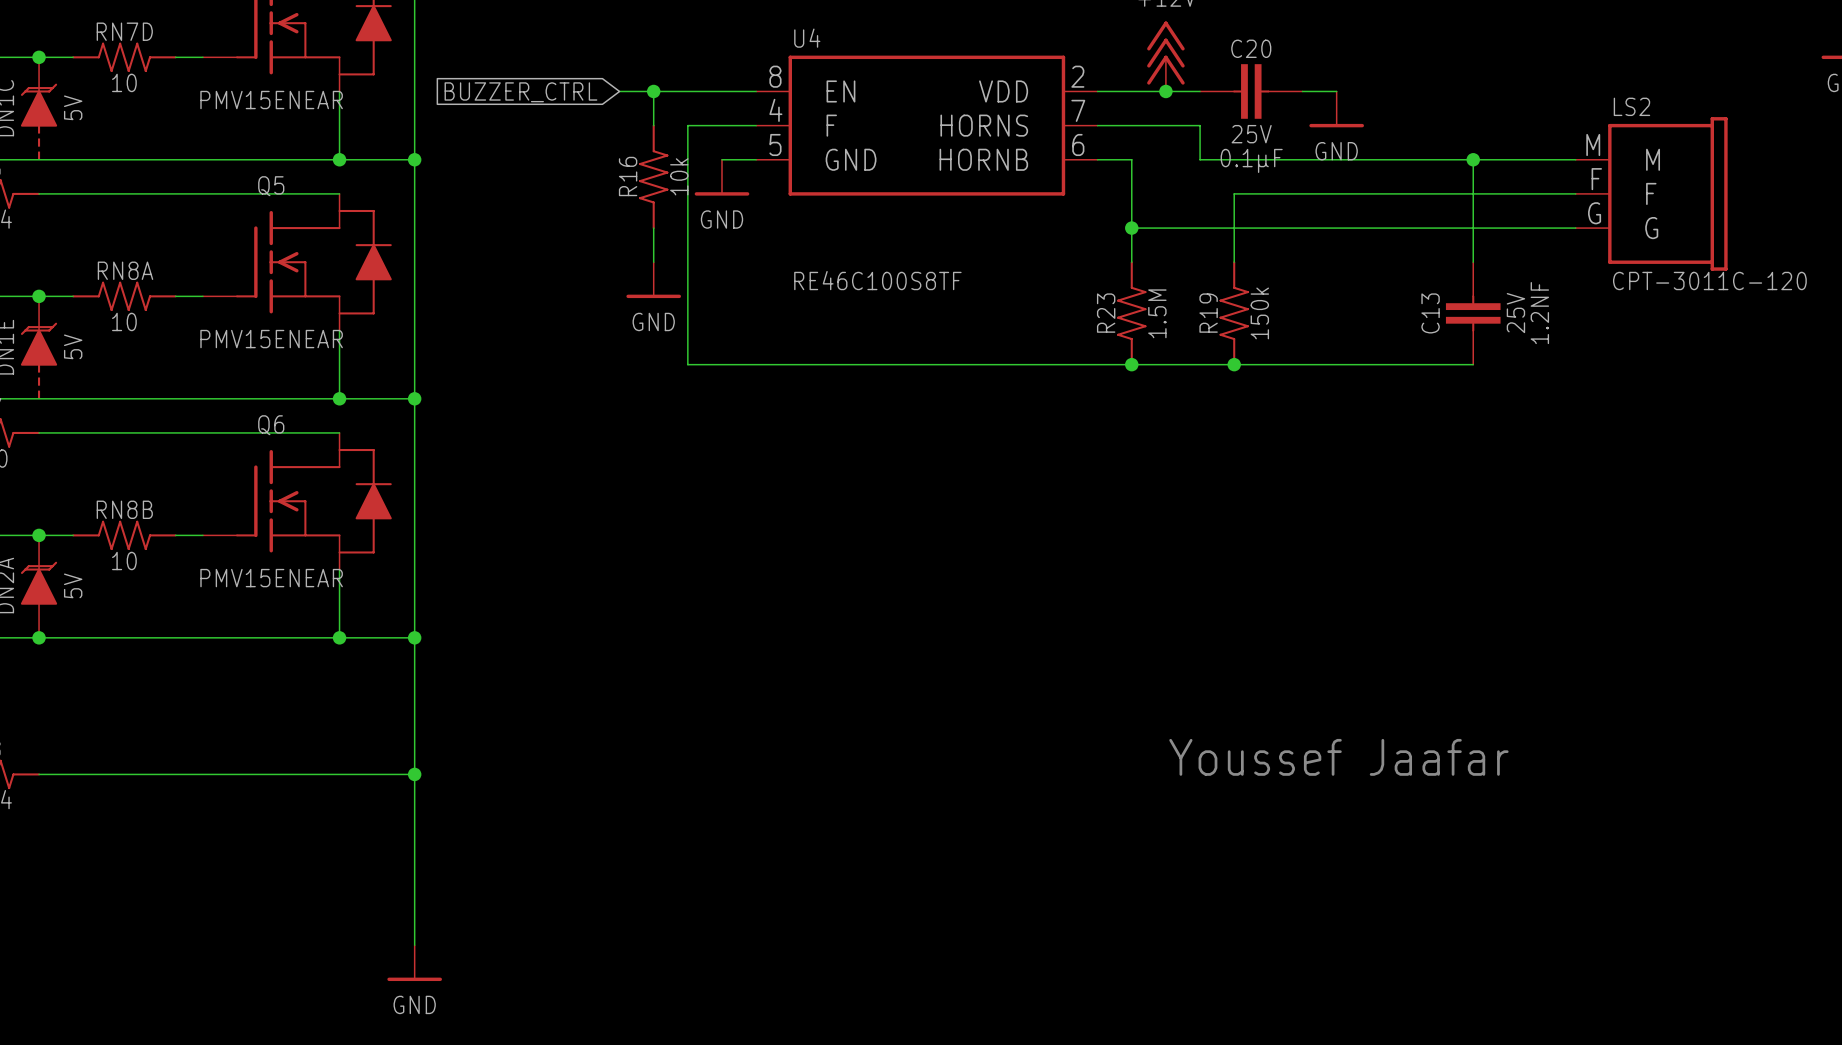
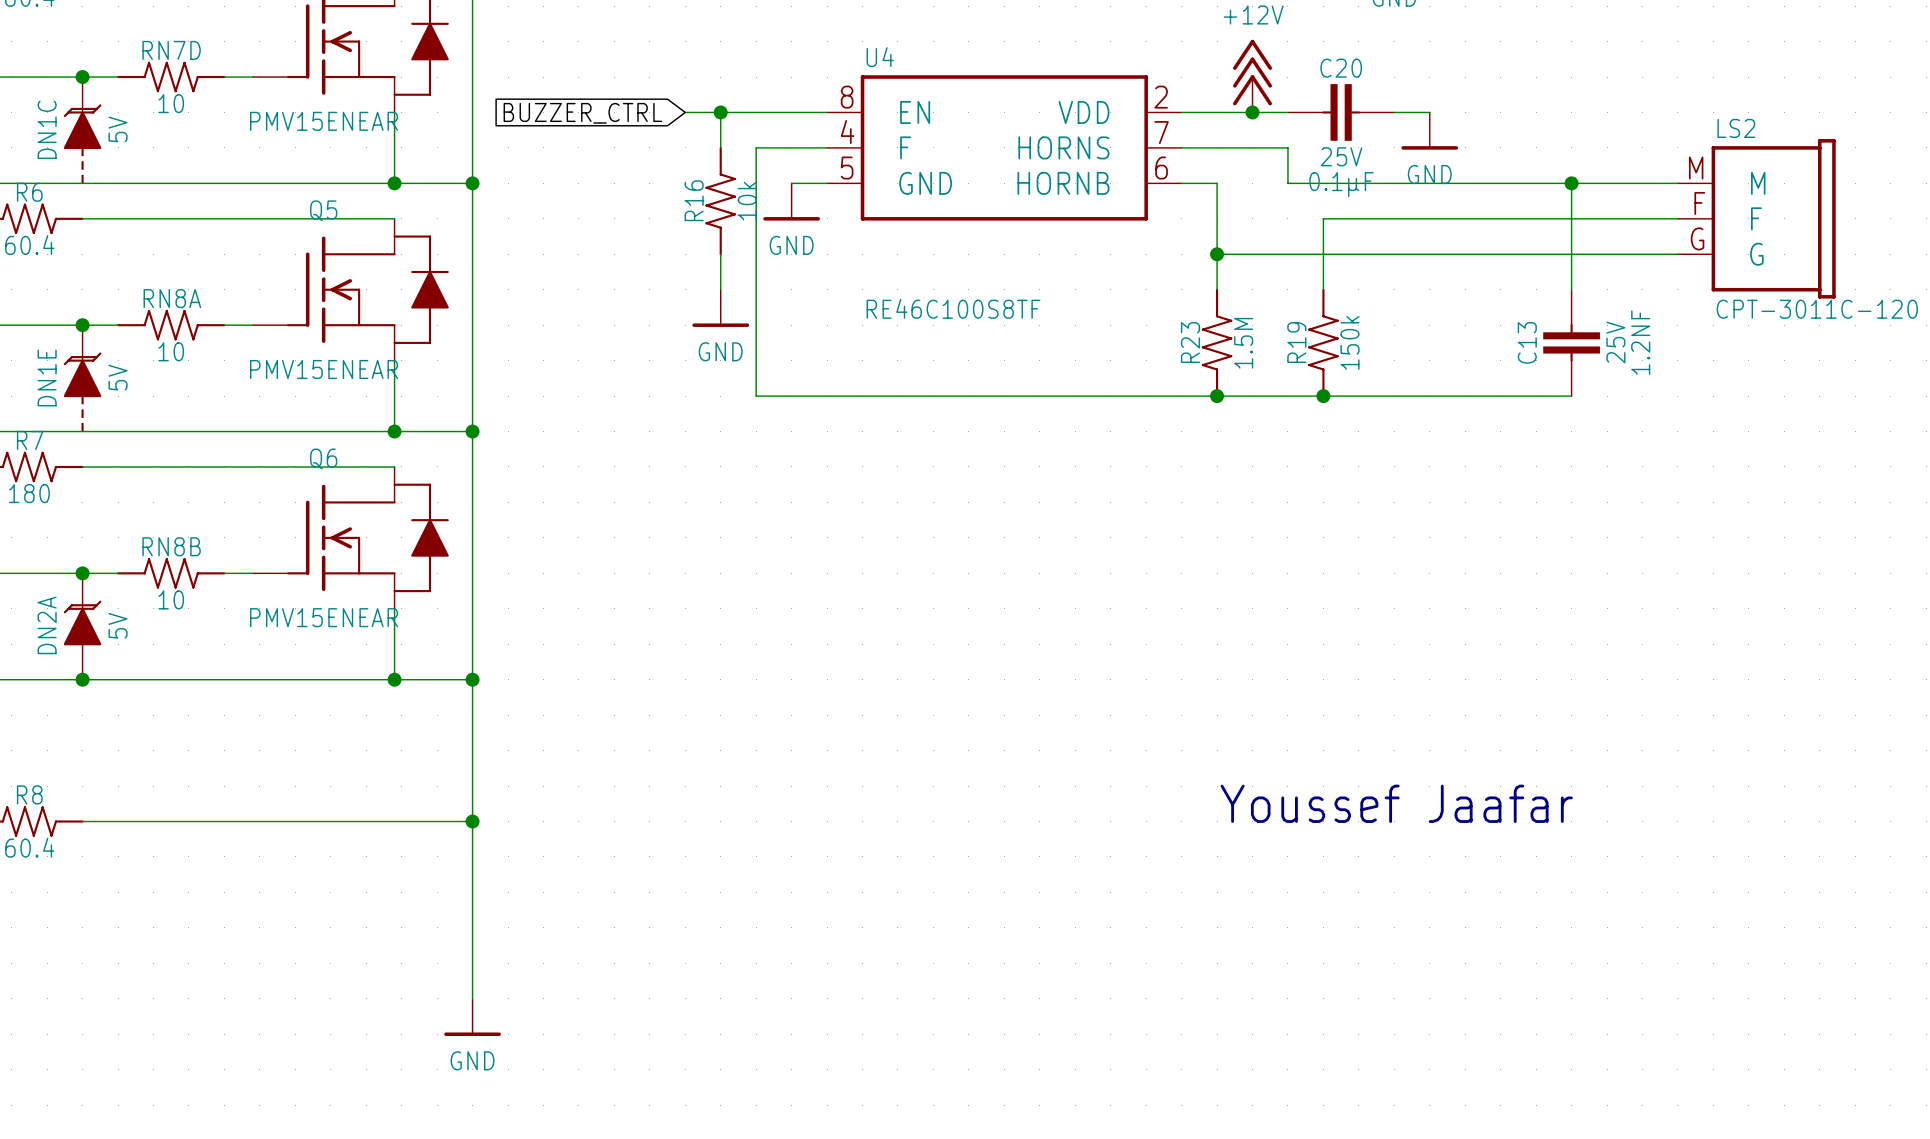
text position: Youssef Jaafar (1338, 757) -> Youssef Jaafar (1396, 803)

